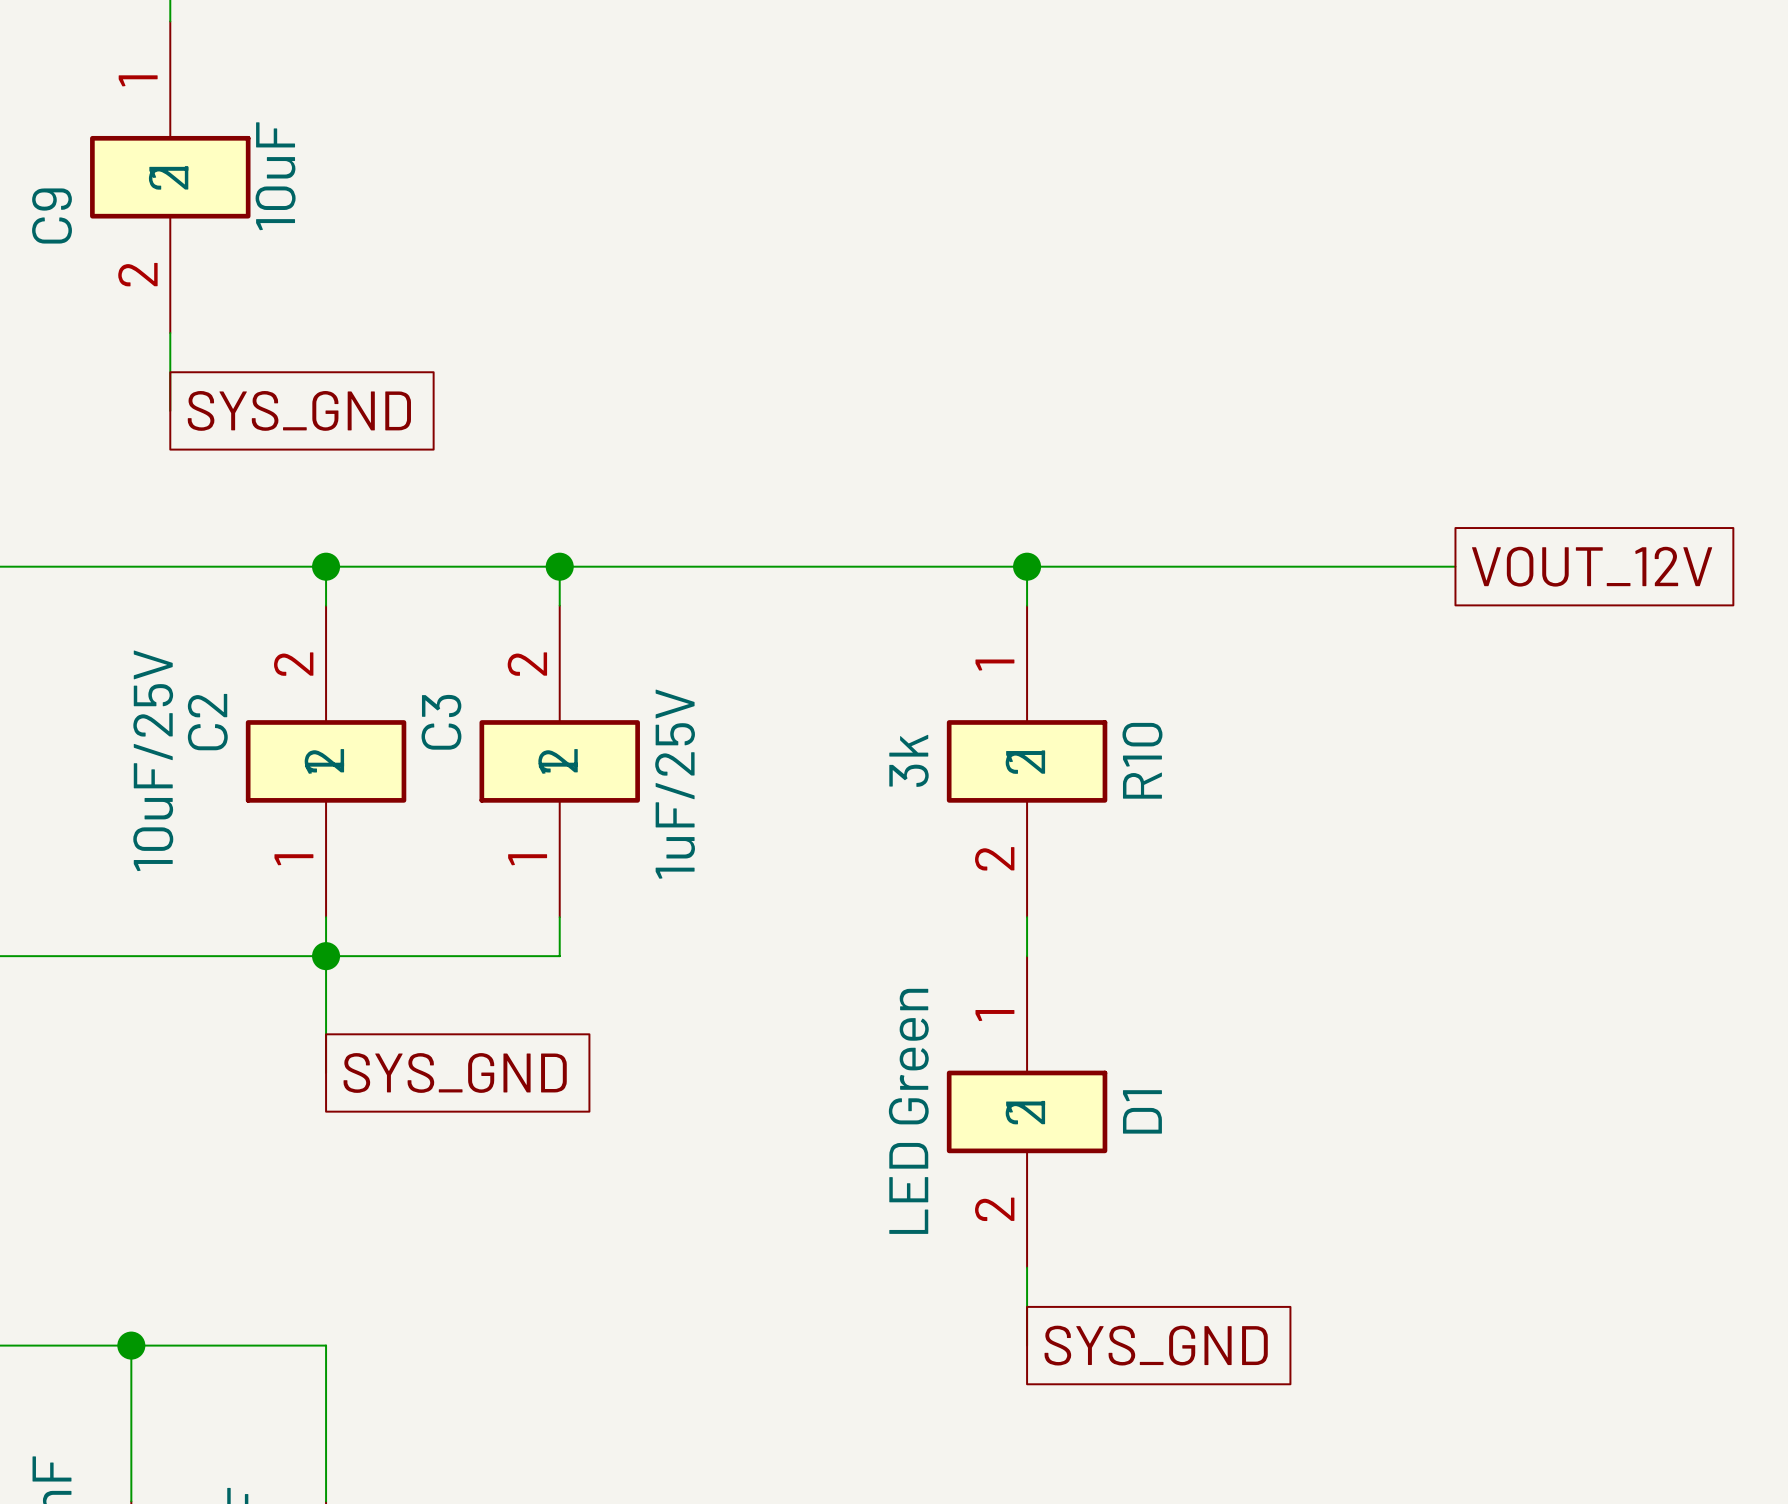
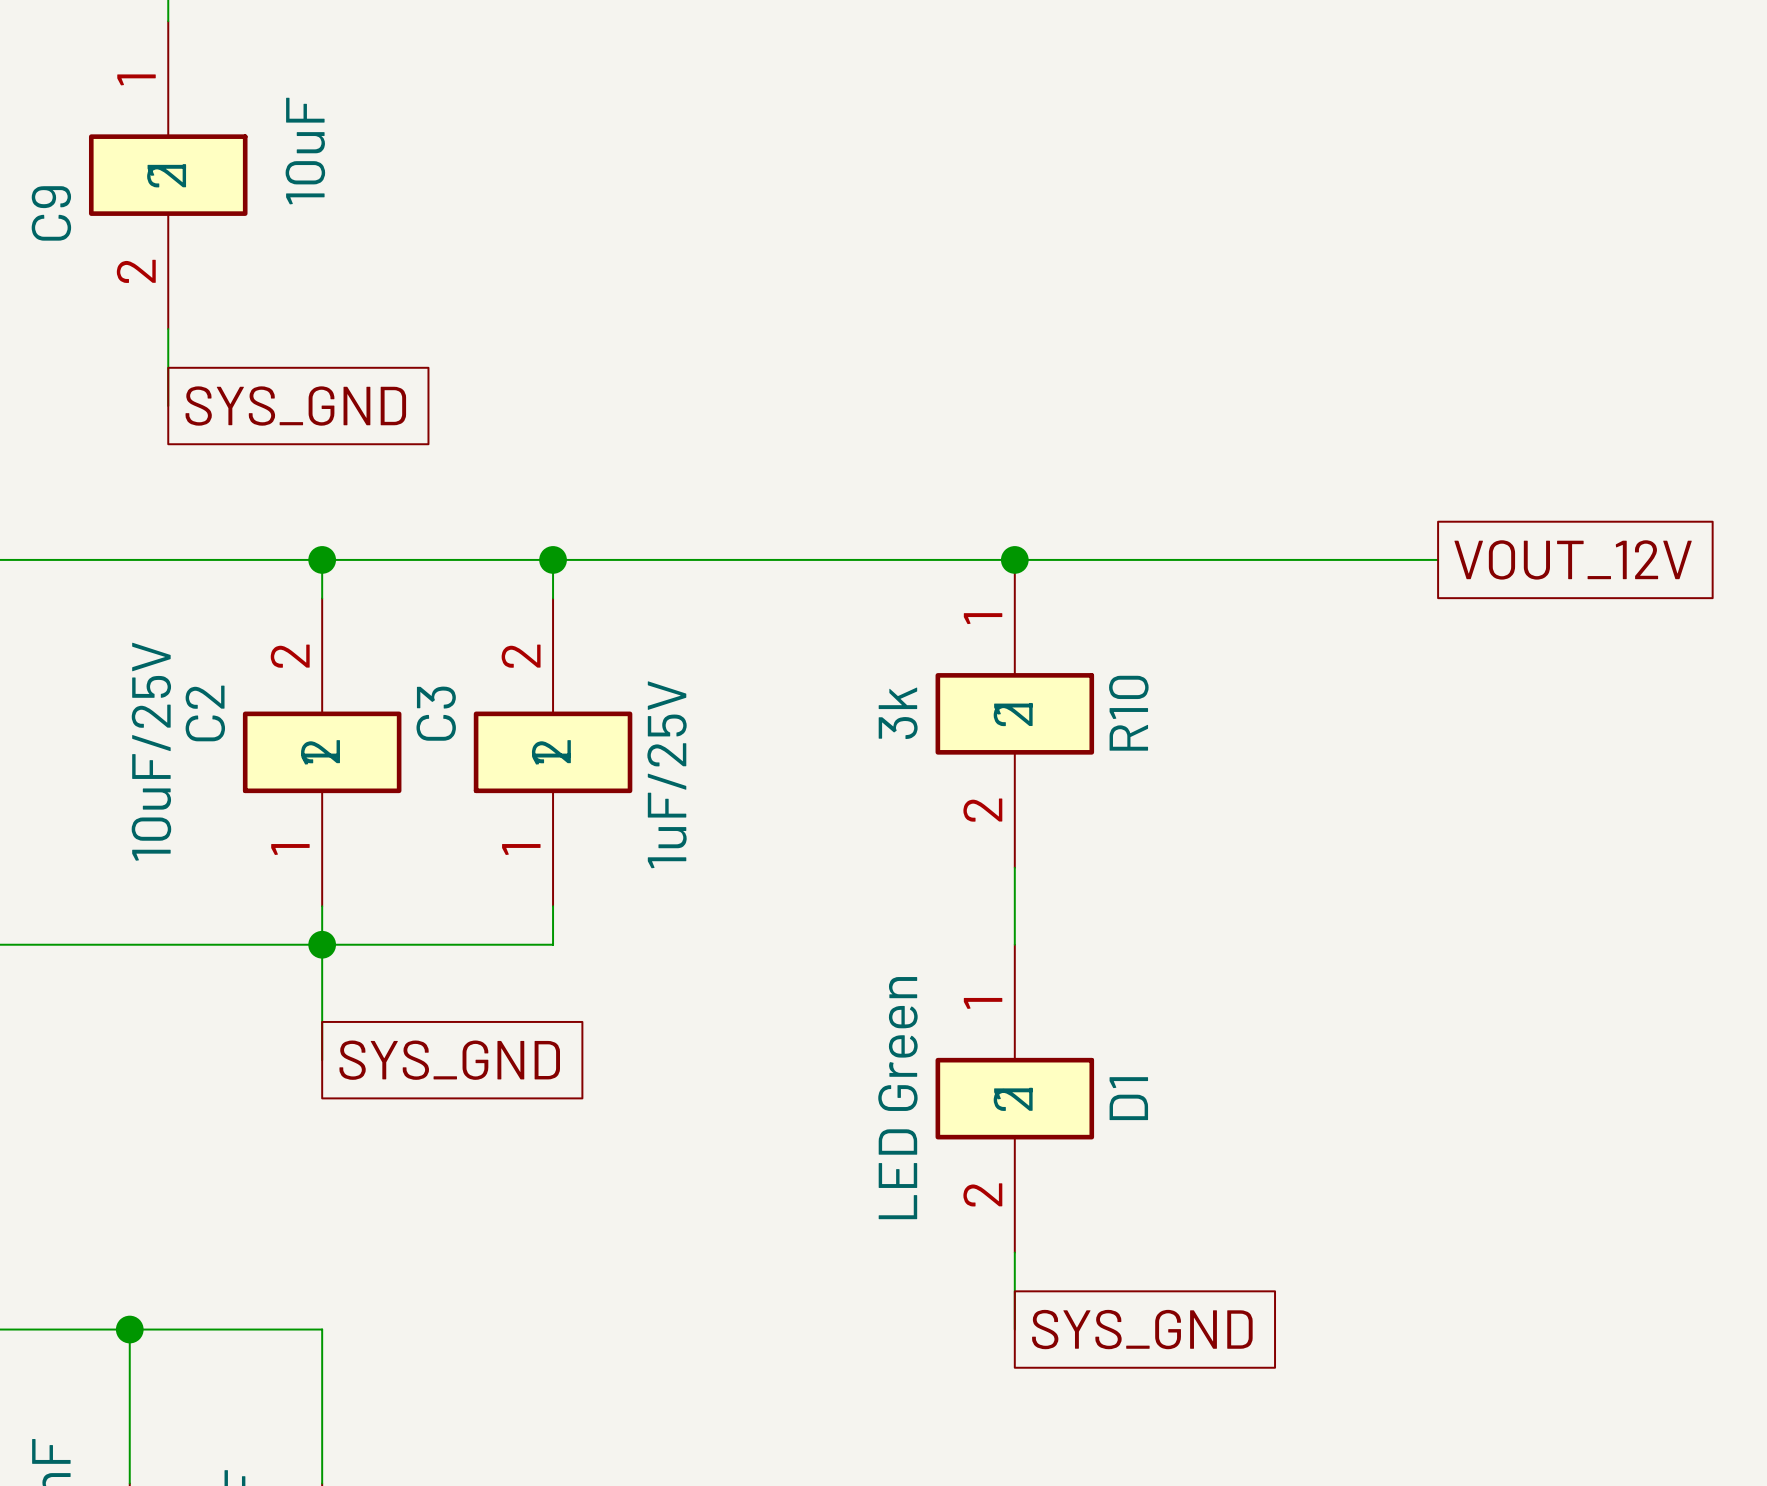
C9 value position: 10uF (275, 176) -> 10uF (305, 151)
R10 position: (1027, 761) -> (1014, 713)

